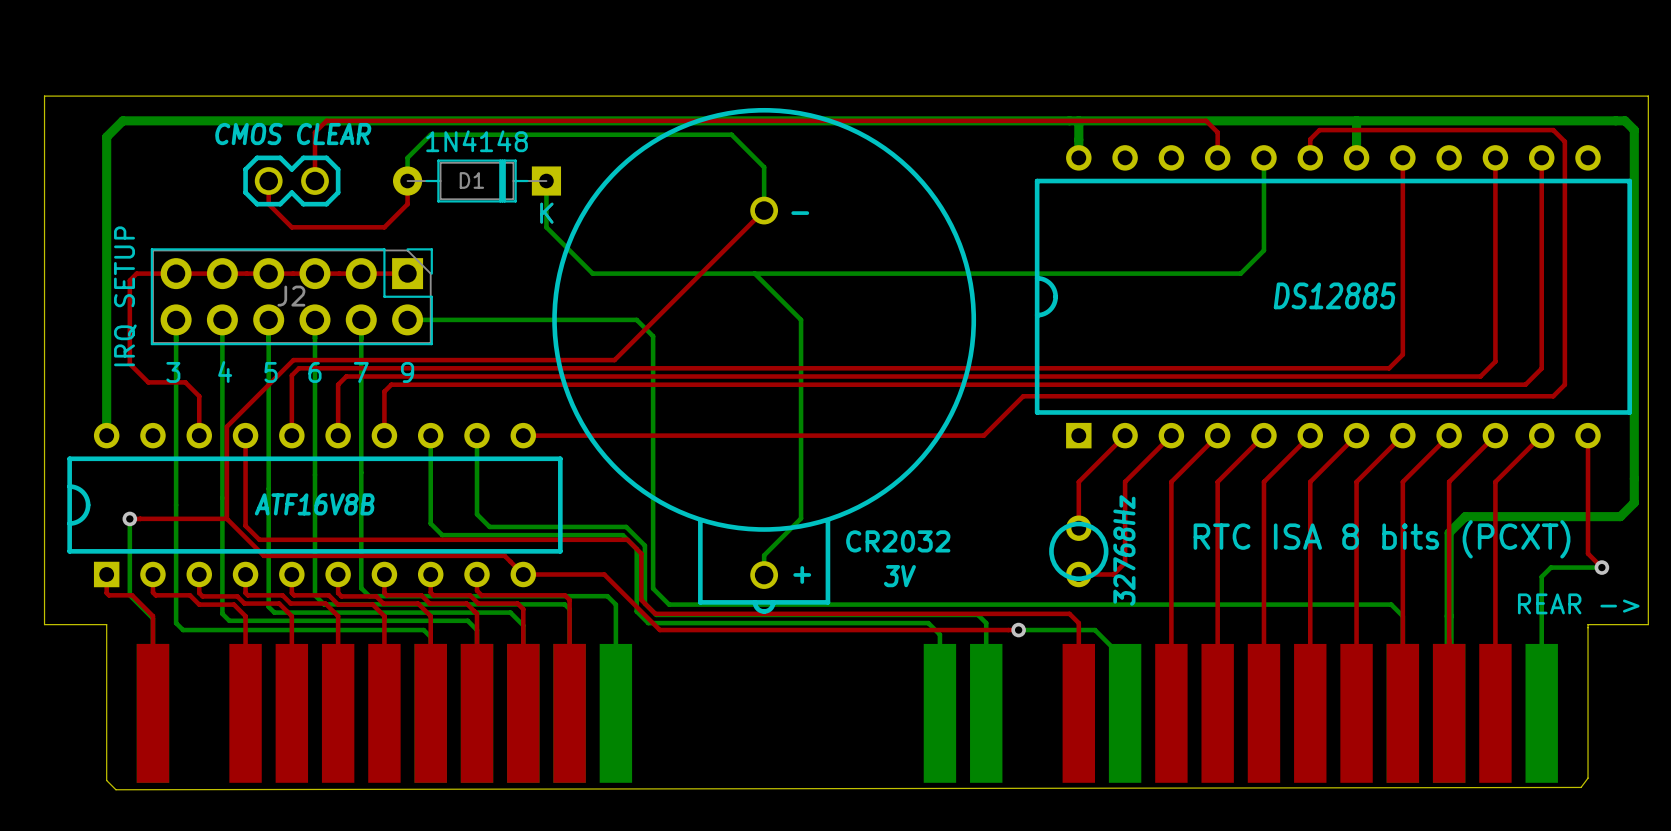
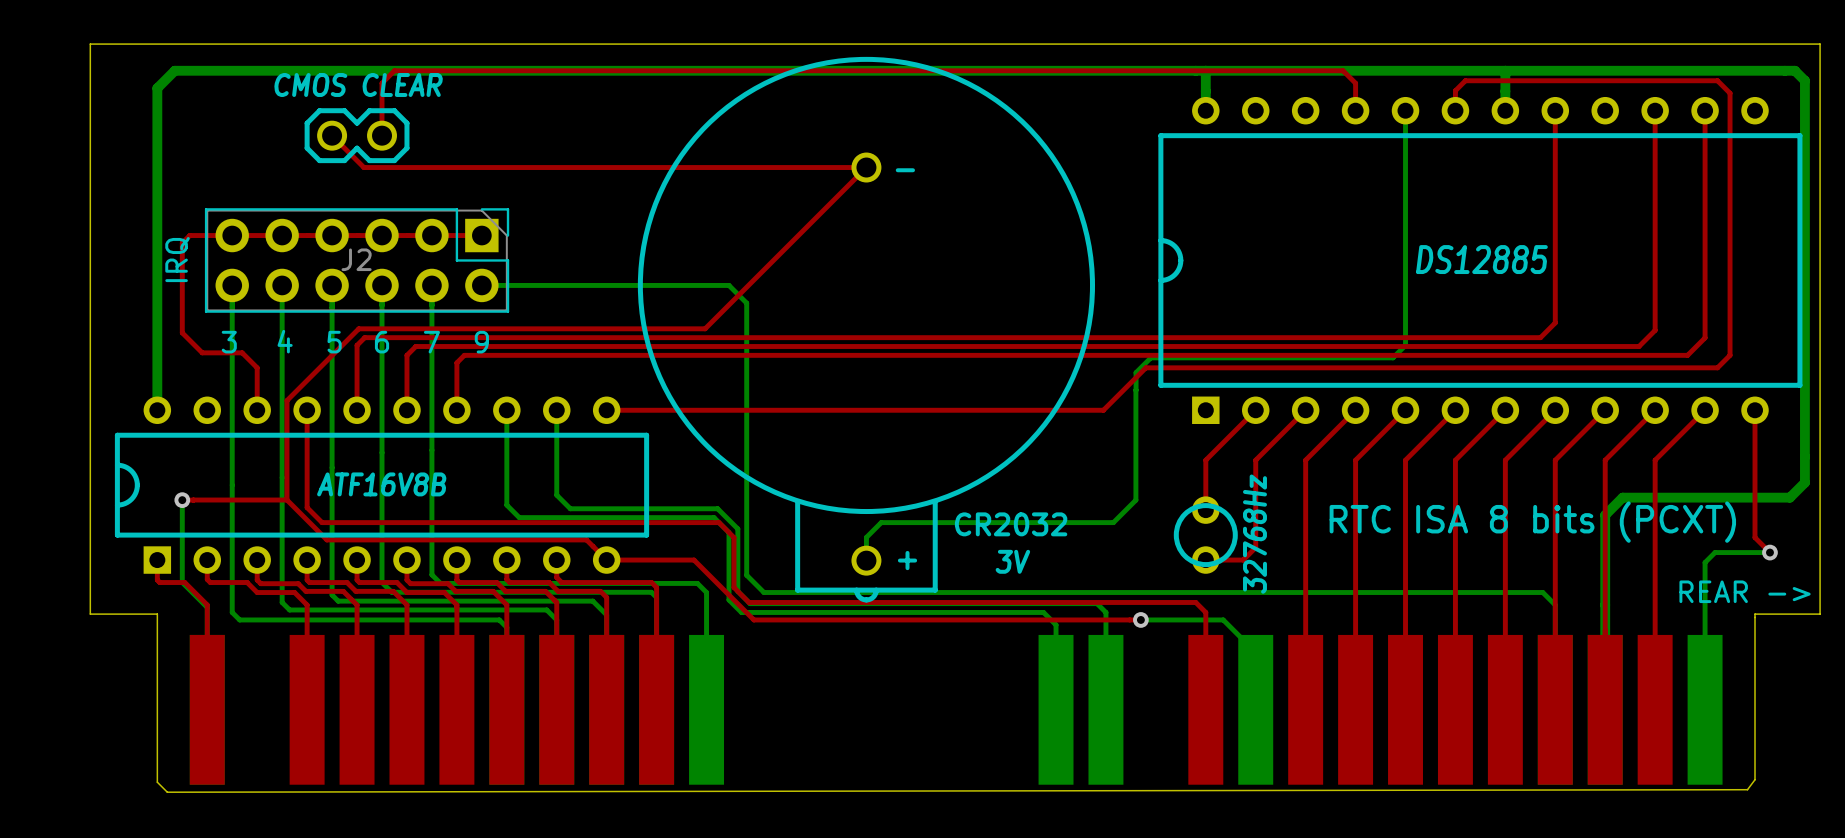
top track: (268, 181) (268, 204) (291, 227) (384, 227) (407, 204) (407, 181) -> (332, 135) (363, 167) (866, 167)
bottom track: (407, 181) (407, 157) (430, 134) (731, 134) (764, 167) (764, 210) -> none
D1: 1N4148 (477, 181) -> none
bottom track: (546, 181) (546, 227) (592, 273) (1240, 273) (1263, 250) -> (1136, 390) (1136, 372) (1150, 357) (1393, 357) (1405, 345) (1405, 210)
bottom track: (754, 273) (801, 319) (801, 518) (764, 555) -> (1135, 390) (1135, 500) (1113, 522) (881, 522) (866, 539)
J2 value: IRQ SETUP (125, 296) -> IRQ (177, 259)

